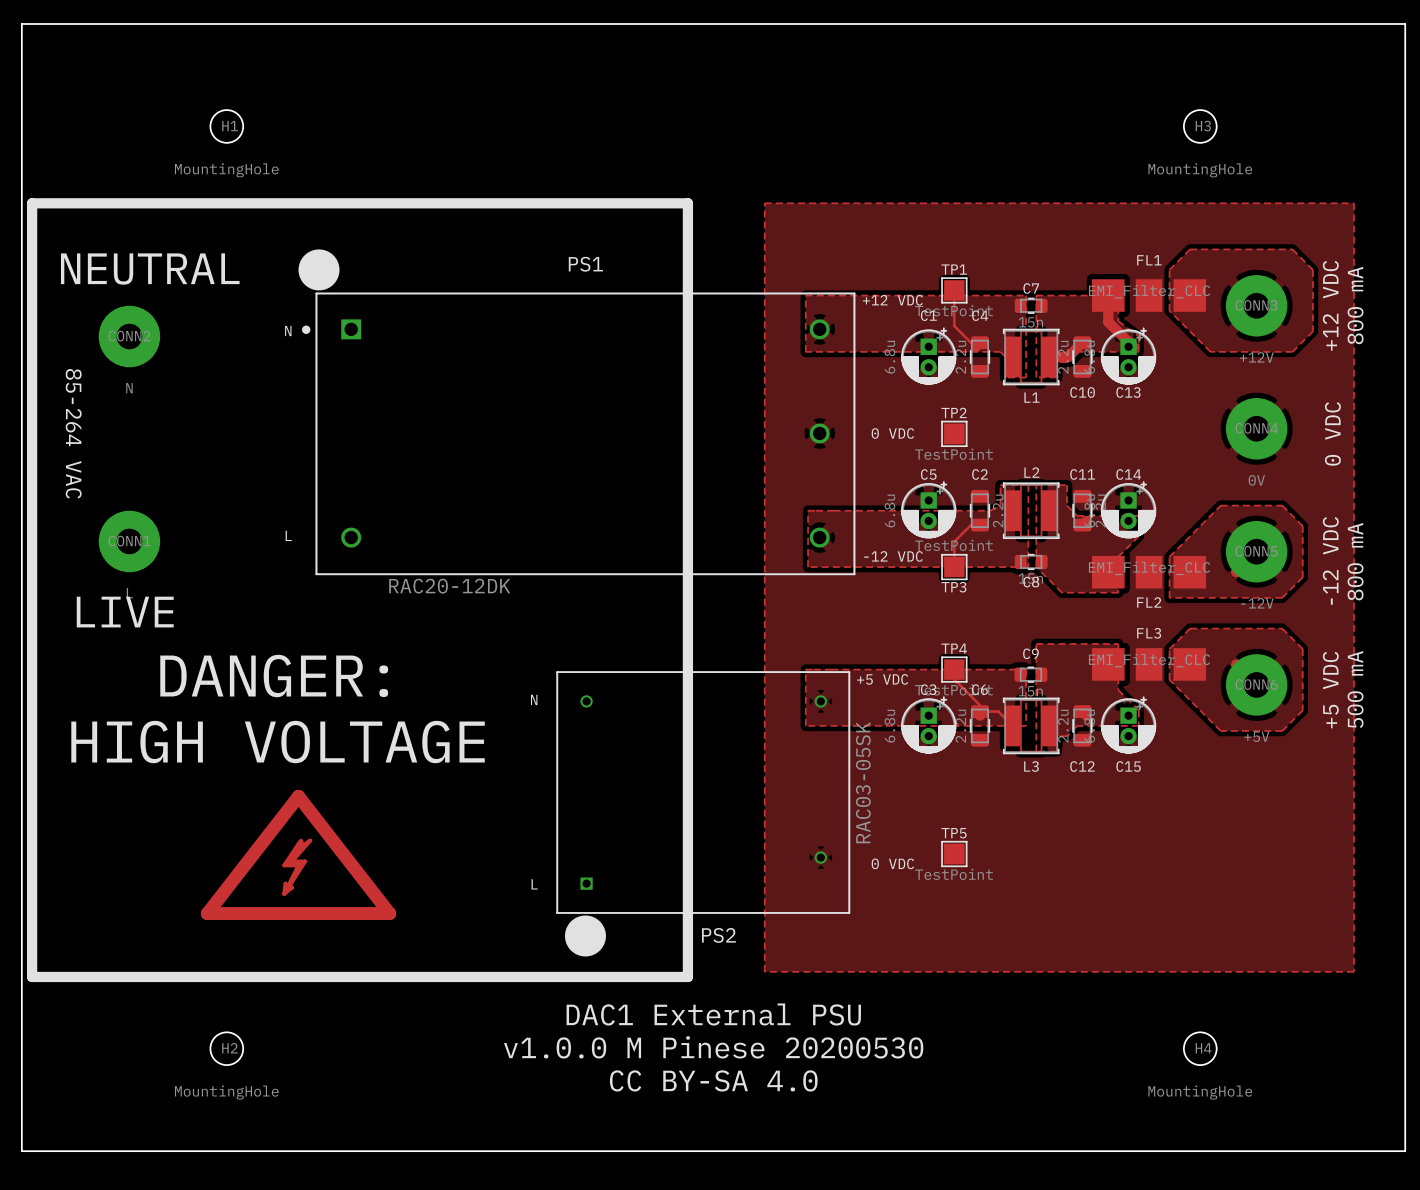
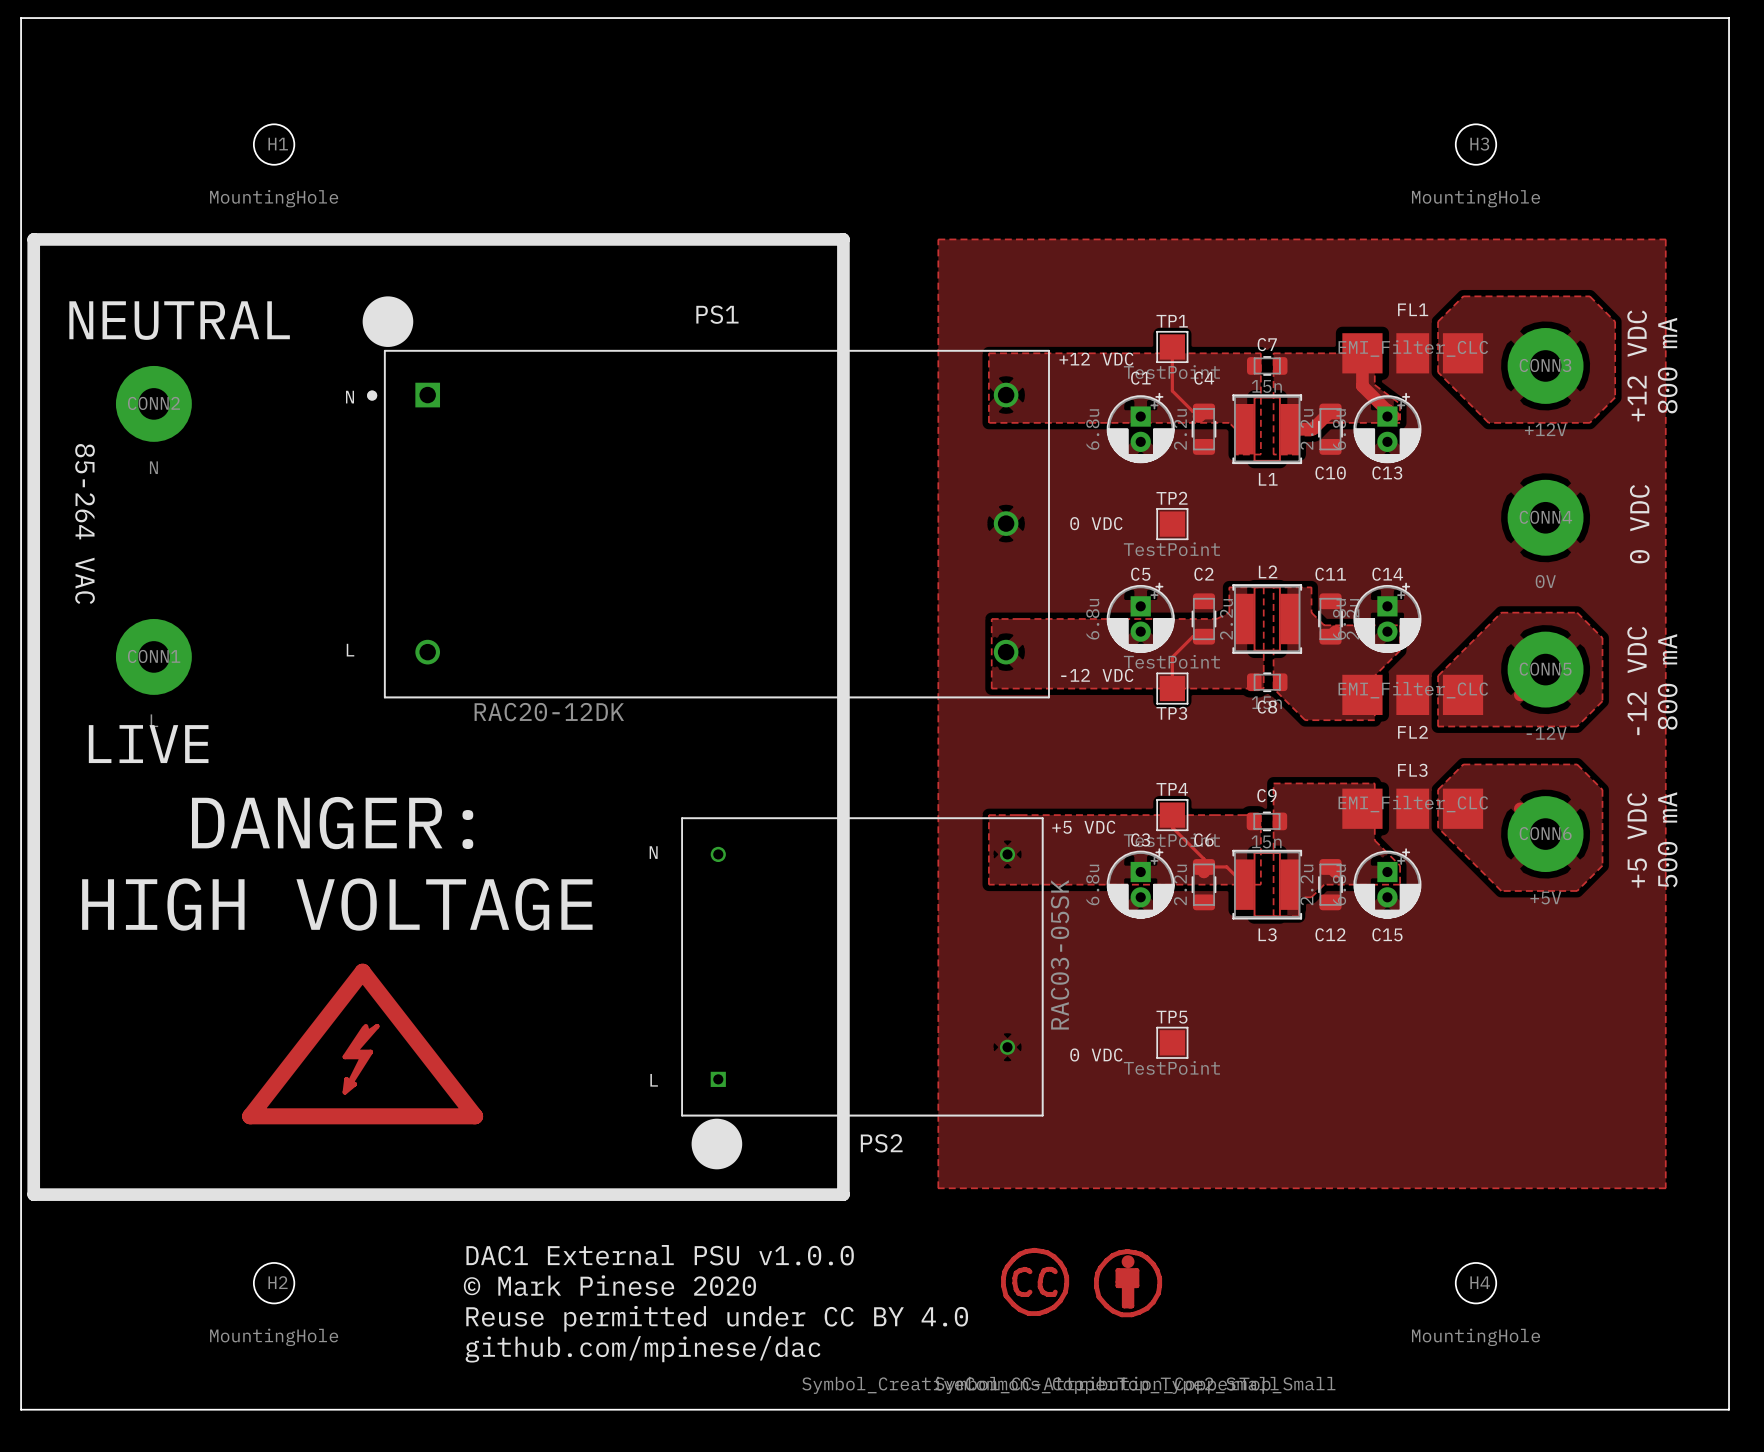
text: DAC1 External PSU (713, 1014) -> none
drawing: none -> [1001, 1247, 1163, 1318]
text: none -> DAC1 External PSU v1.0.0 (660, 1255)
text: v1.0.0 M Pinese 20200530 (713, 1047) -> none
text: none -> © Mark Pinese 2020 (609, 1285)
text: none -> Reuse permitted under CC BY 4.0 (717, 1318)
text: CC BY-SA 4.0 (713, 1080) -> none
text: none -> github.com/mpinese/dac (643, 1349)

